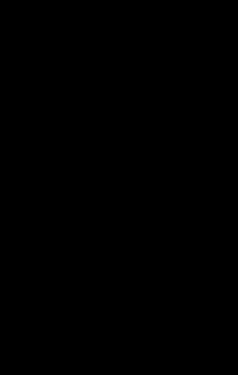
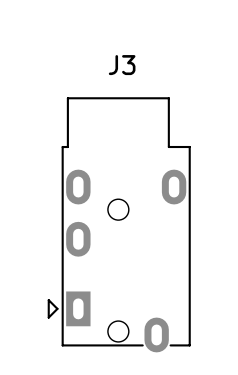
J3: none -> (119, 224)

